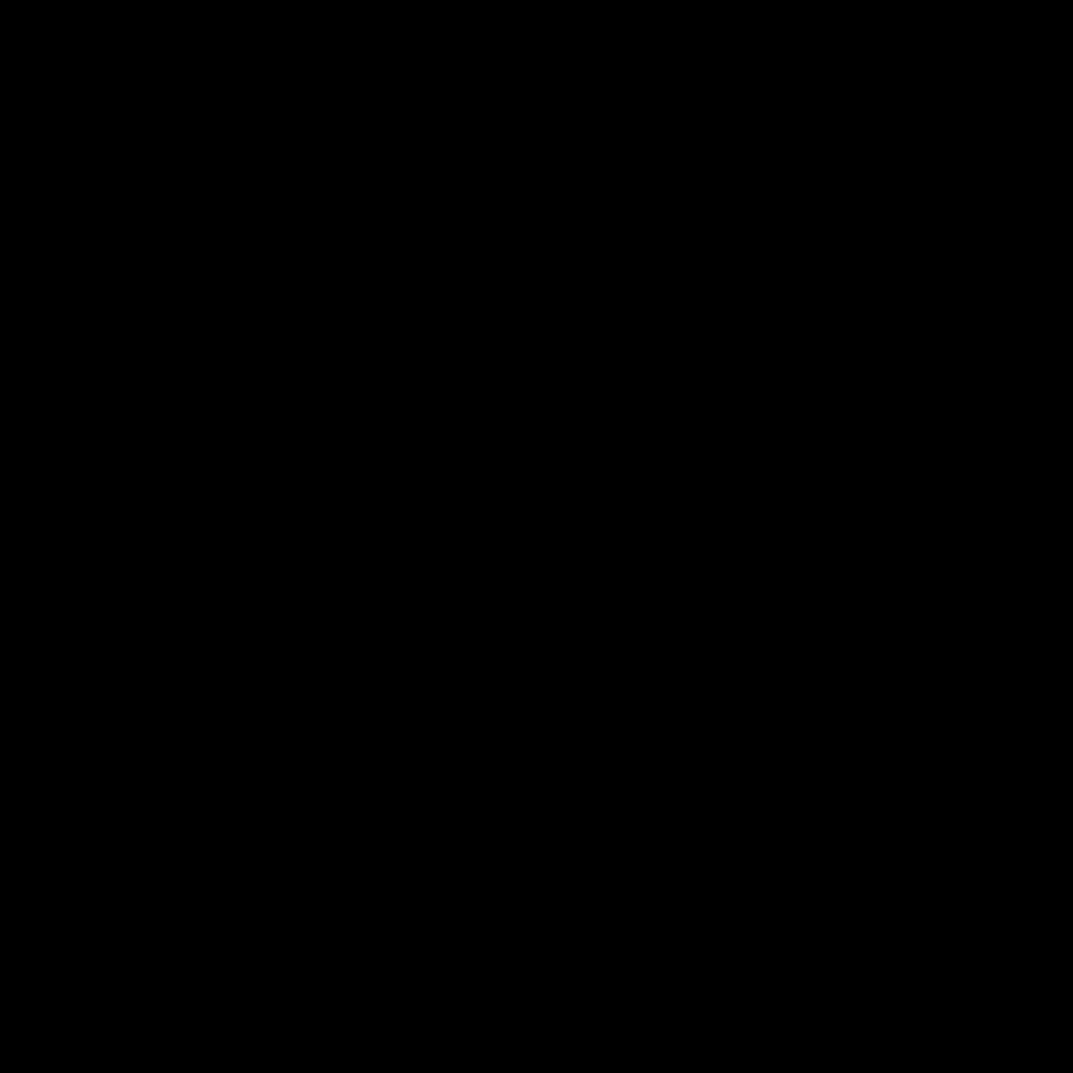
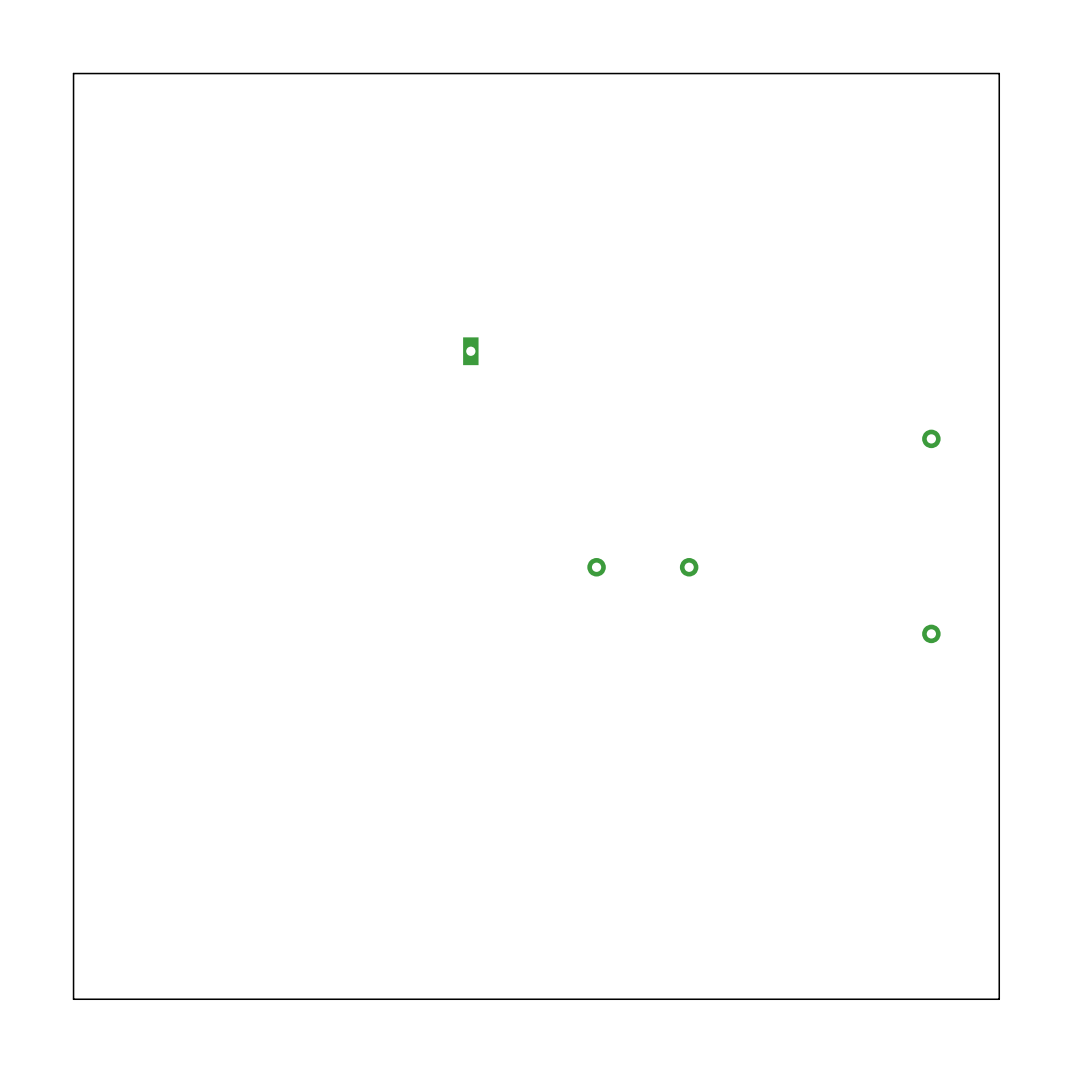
board edge: none -> (999, 73) (73, 73) (73, 999) (999, 999) (999, 73)
part: none -> (470, 351)
via: none -> (931, 438)
via: none -> (596, 567)
via: none -> (689, 567)
via: none -> (931, 633)

